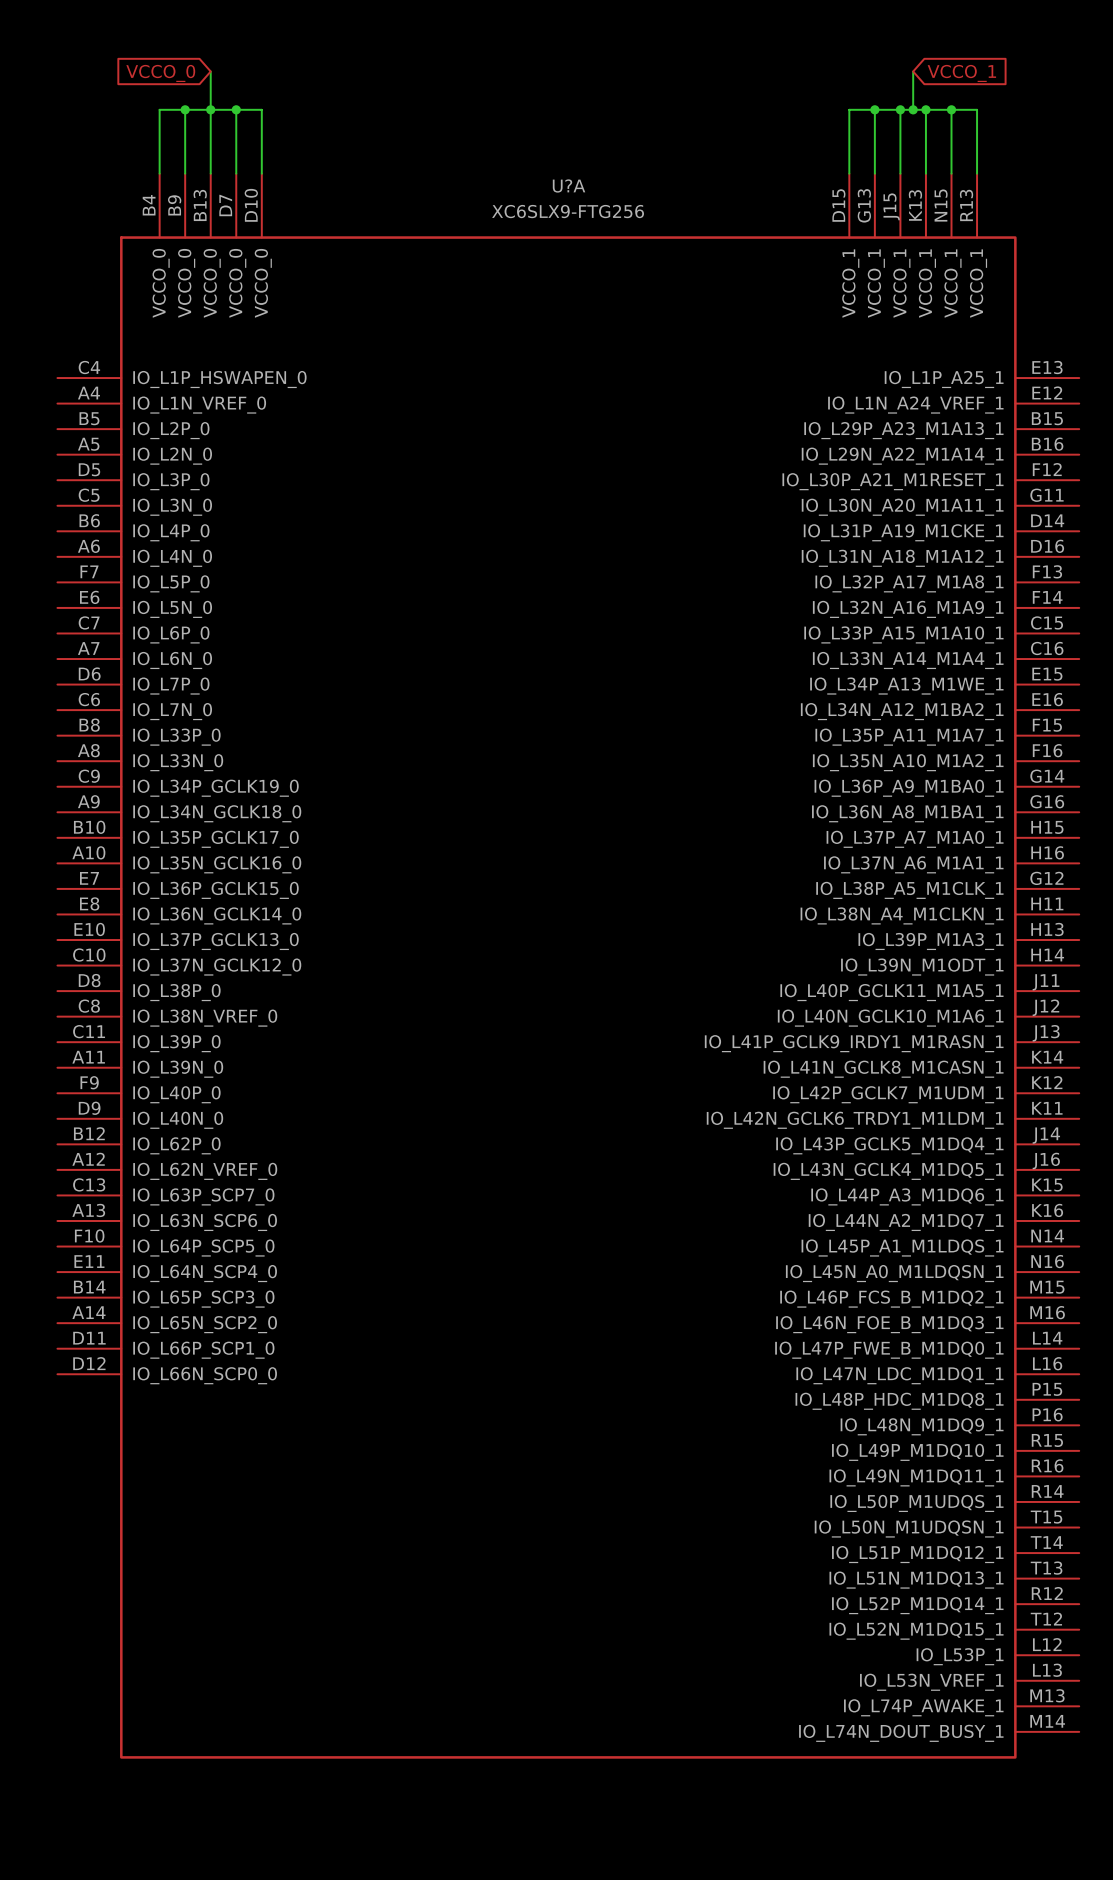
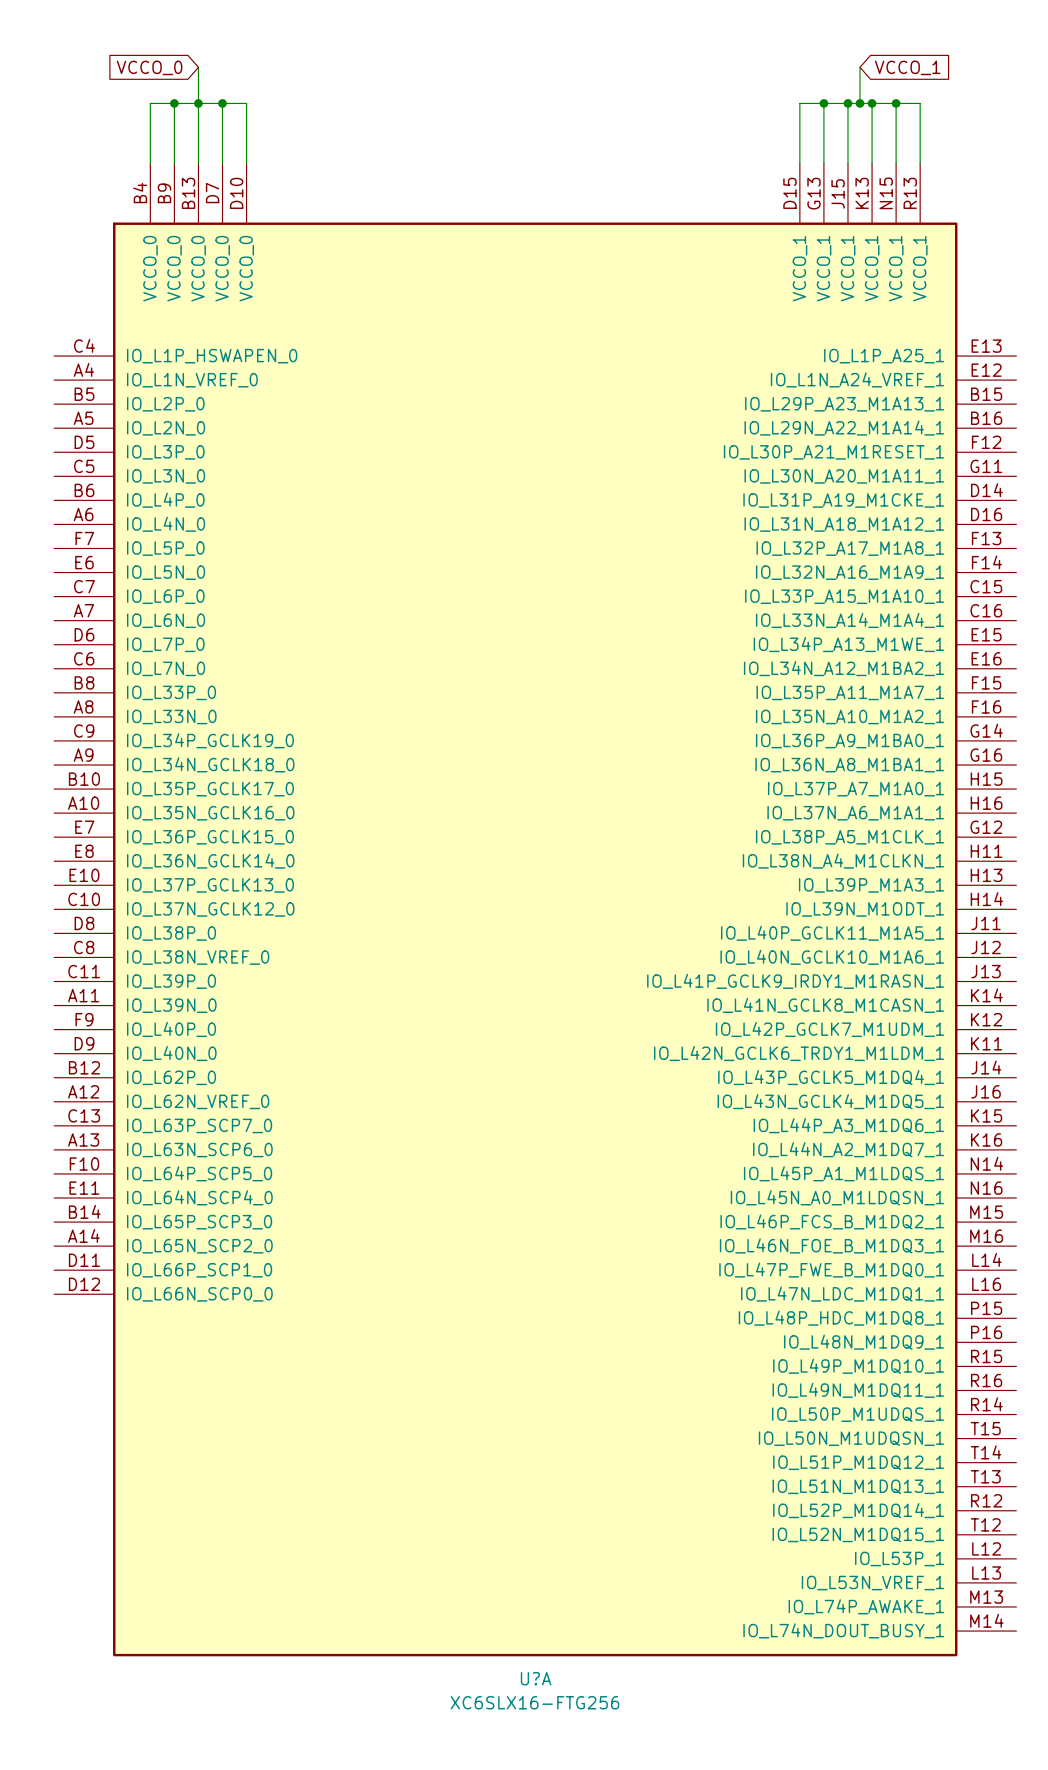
U?A name position: U?A (569, 185) -> U?A (536, 1678)
U?A value: XC6SLX9-FTG256 (568, 211) -> XC6SLX16-FTG256 (534, 1702)

